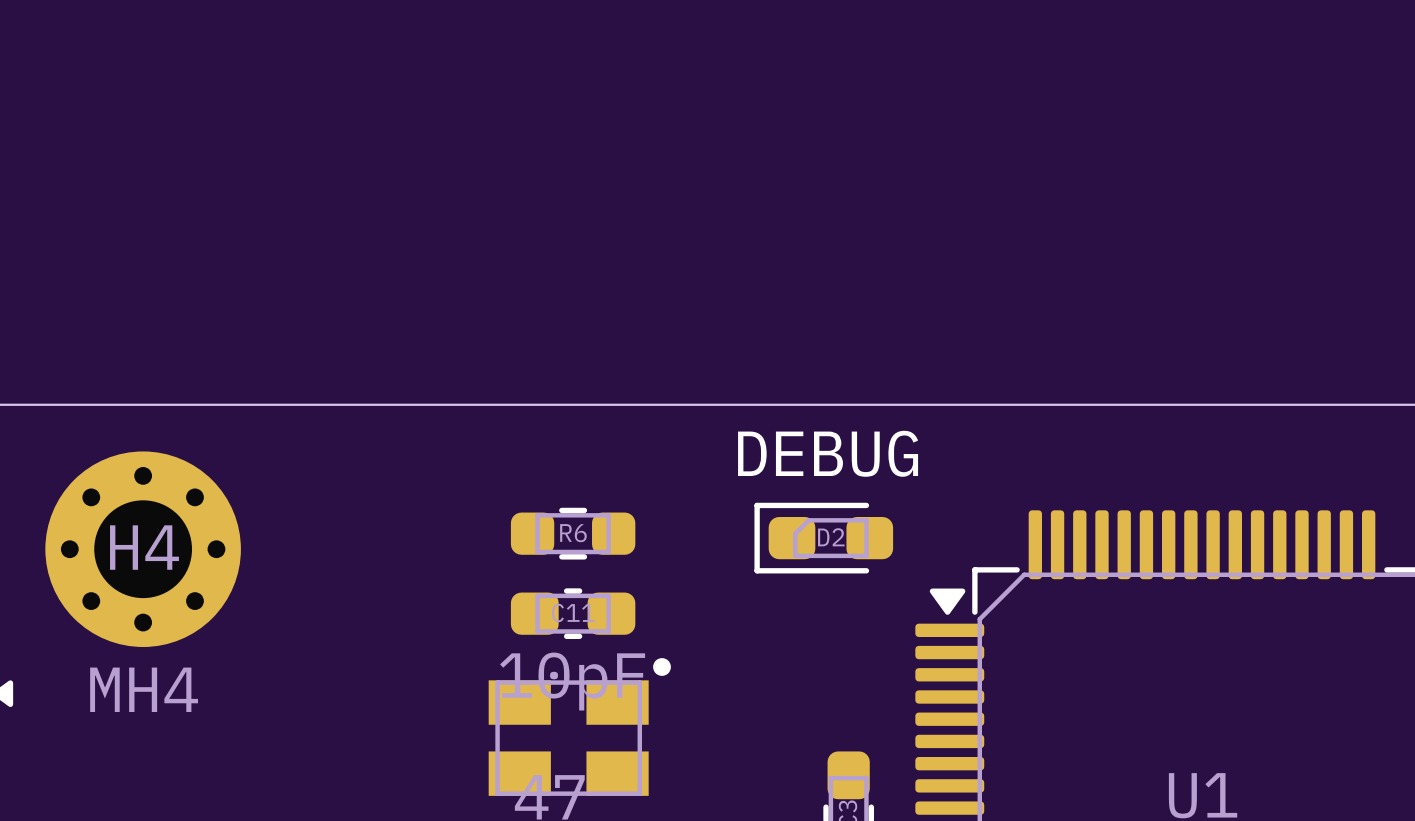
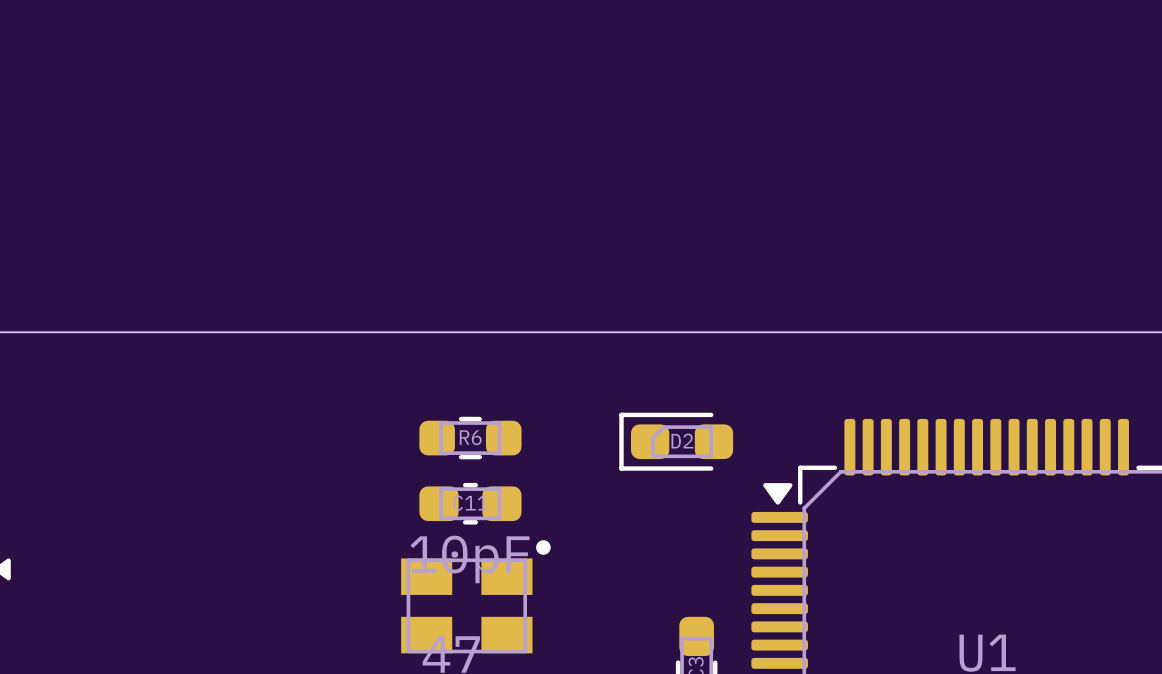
text: DEBUG (828, 453) -> none
H4: MH4 (143, 549) -> none

